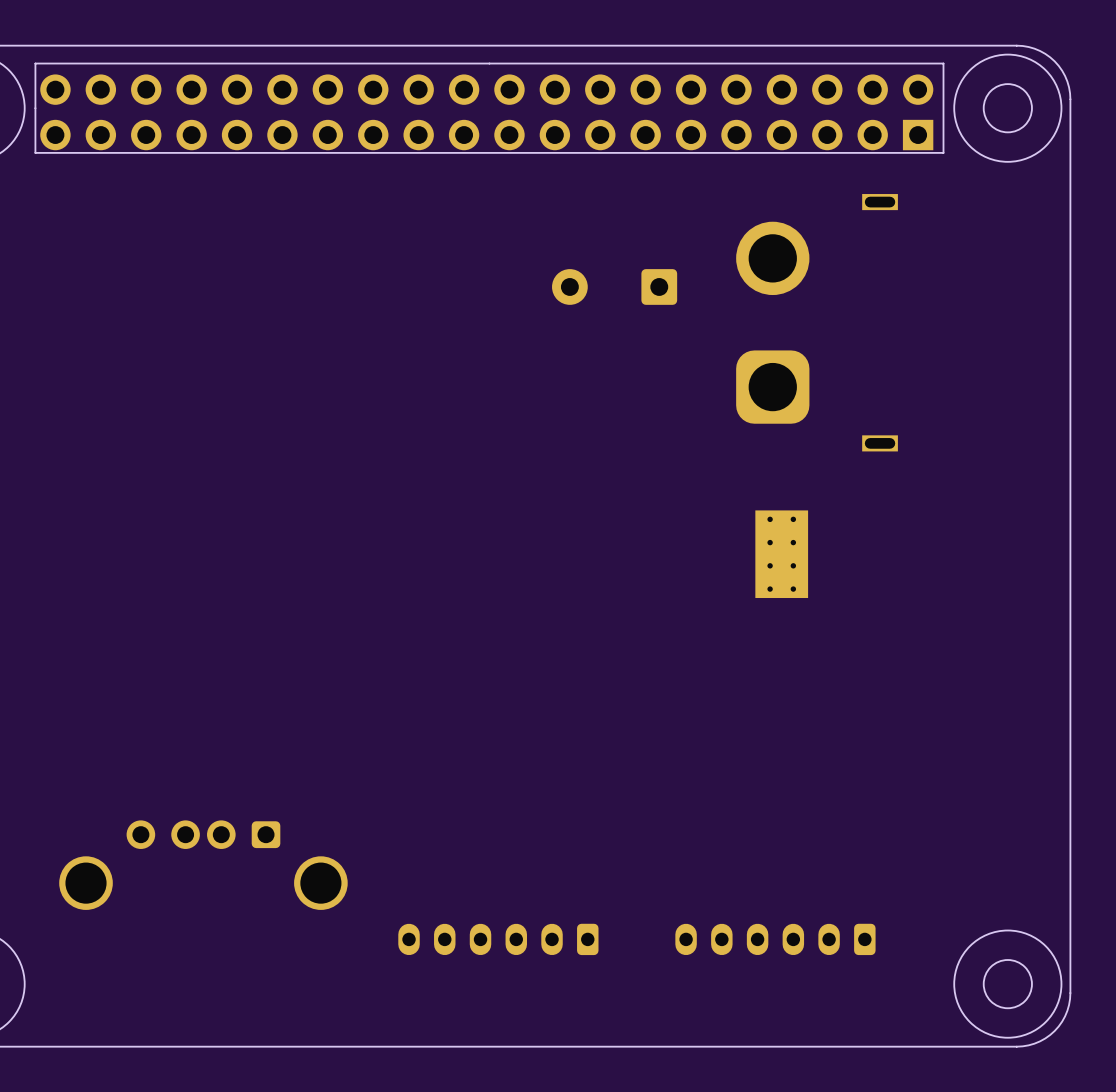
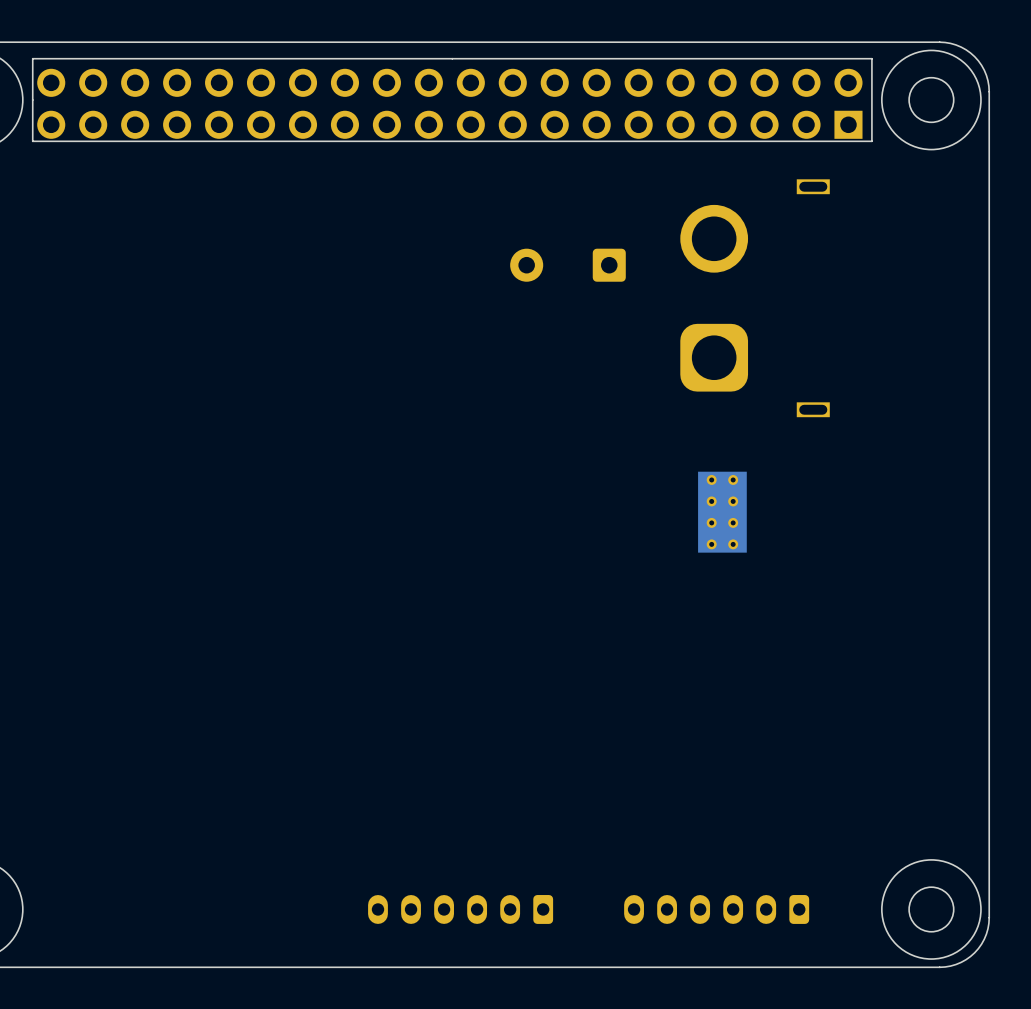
part: (203, 865) -> none
part position: (498, 939) -> (460, 909)
part position: (775, 939) -> (716, 909)

